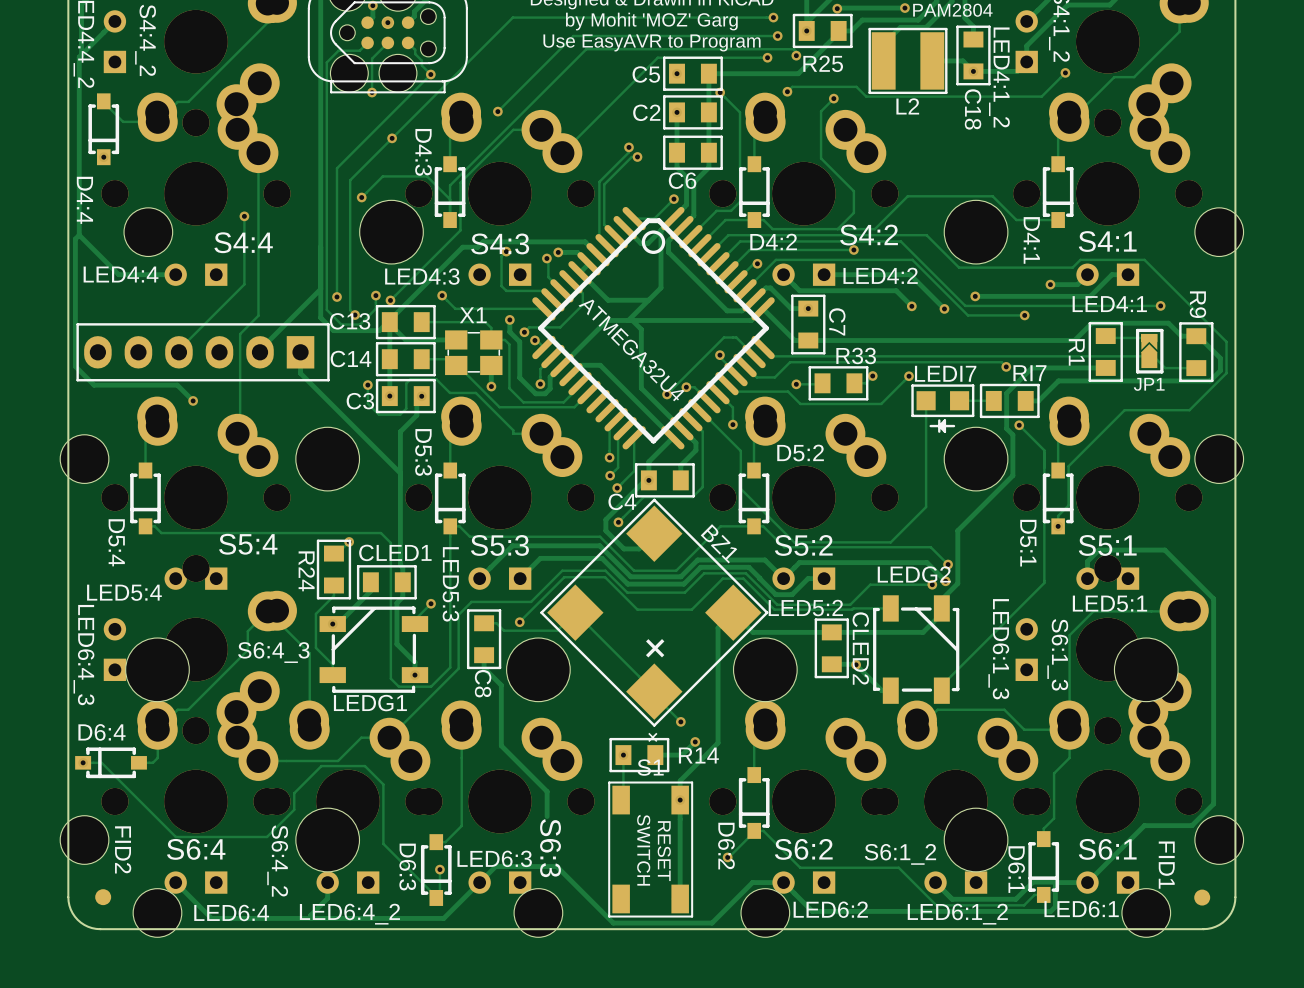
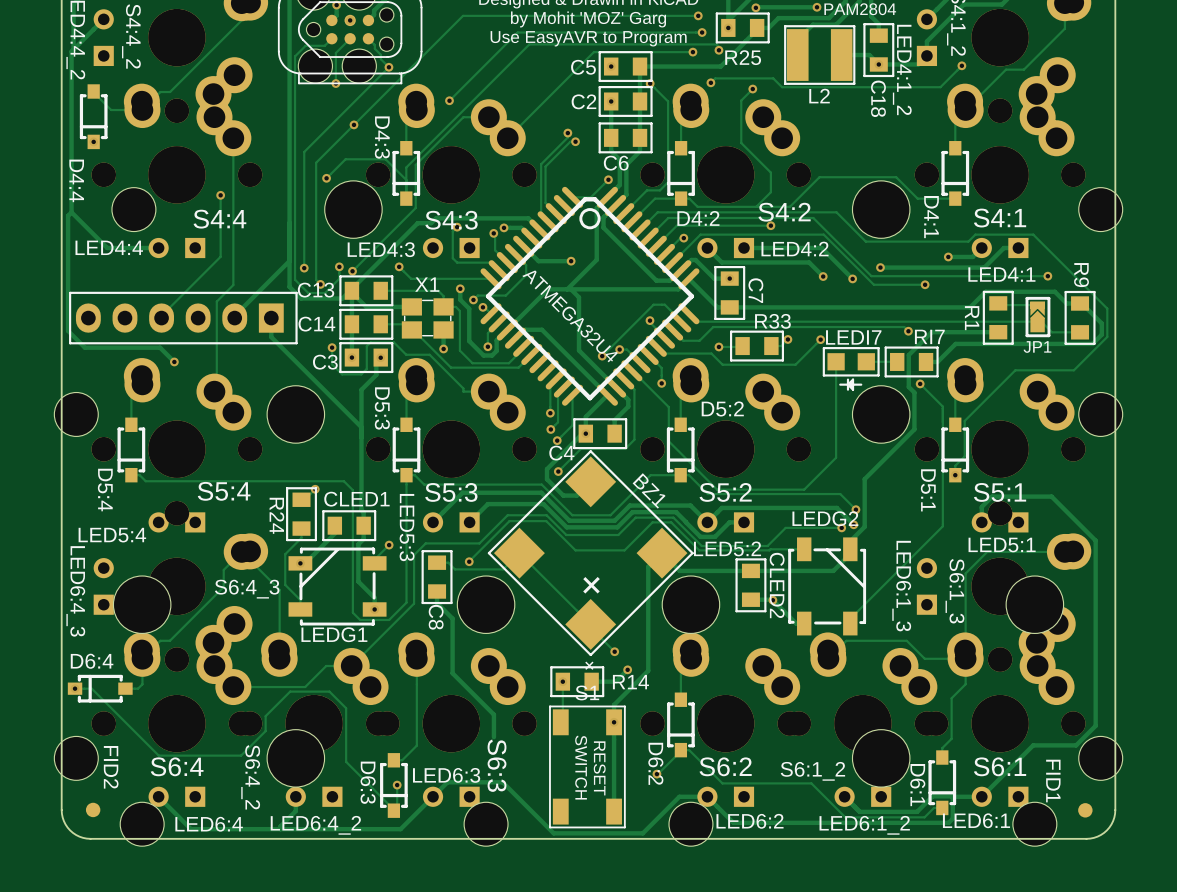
track: (625, 227) (641, 243) (647, 243) (660, 230) -> none
track: (589, 263) (580, 272) (608, 300) (648, 300) -> none
track: none -> (523, 246) (538, 261) (571, 261)
via: none -> (571, 261)

